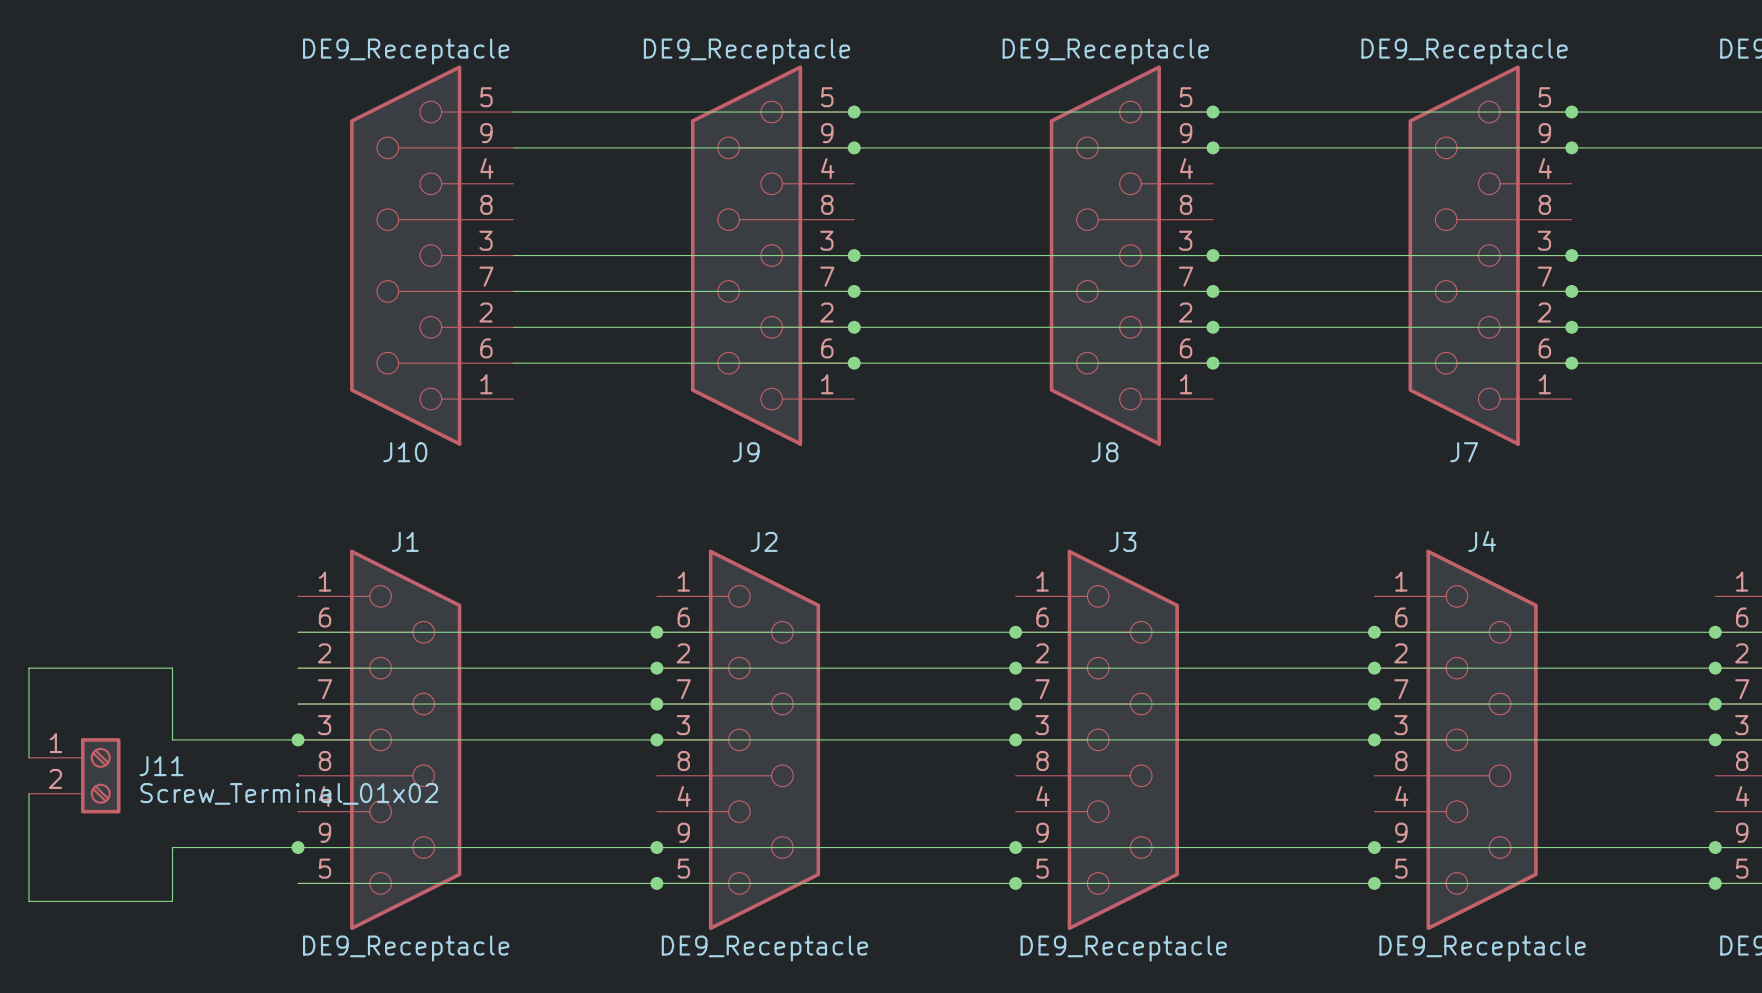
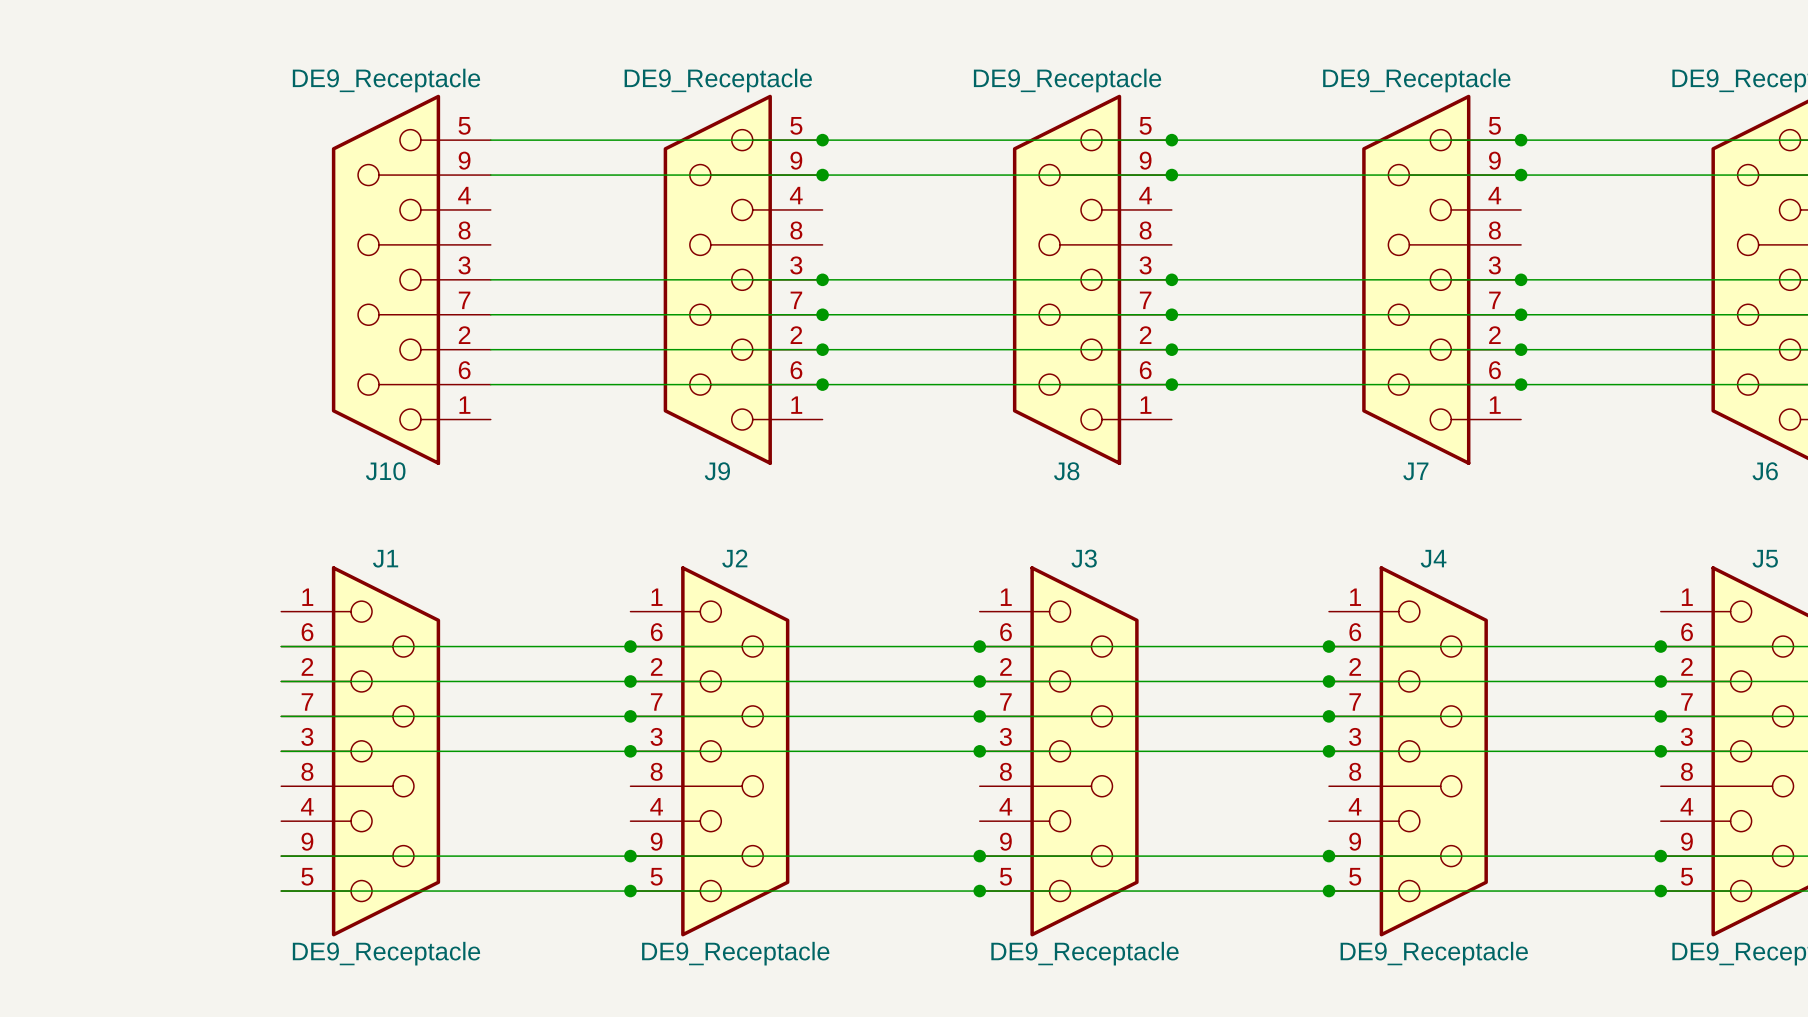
wire: (298, 739) (172, 739) (172, 668) (28, 668) (28, 757) -> none
junction: (298, 739) -> none
J11: Screw_Terminal_01x02 (74, 775) -> none
wire: (28, 793) (28, 901) (172, 901) (172, 847) (298, 847) -> none
junction: (298, 847) -> none

